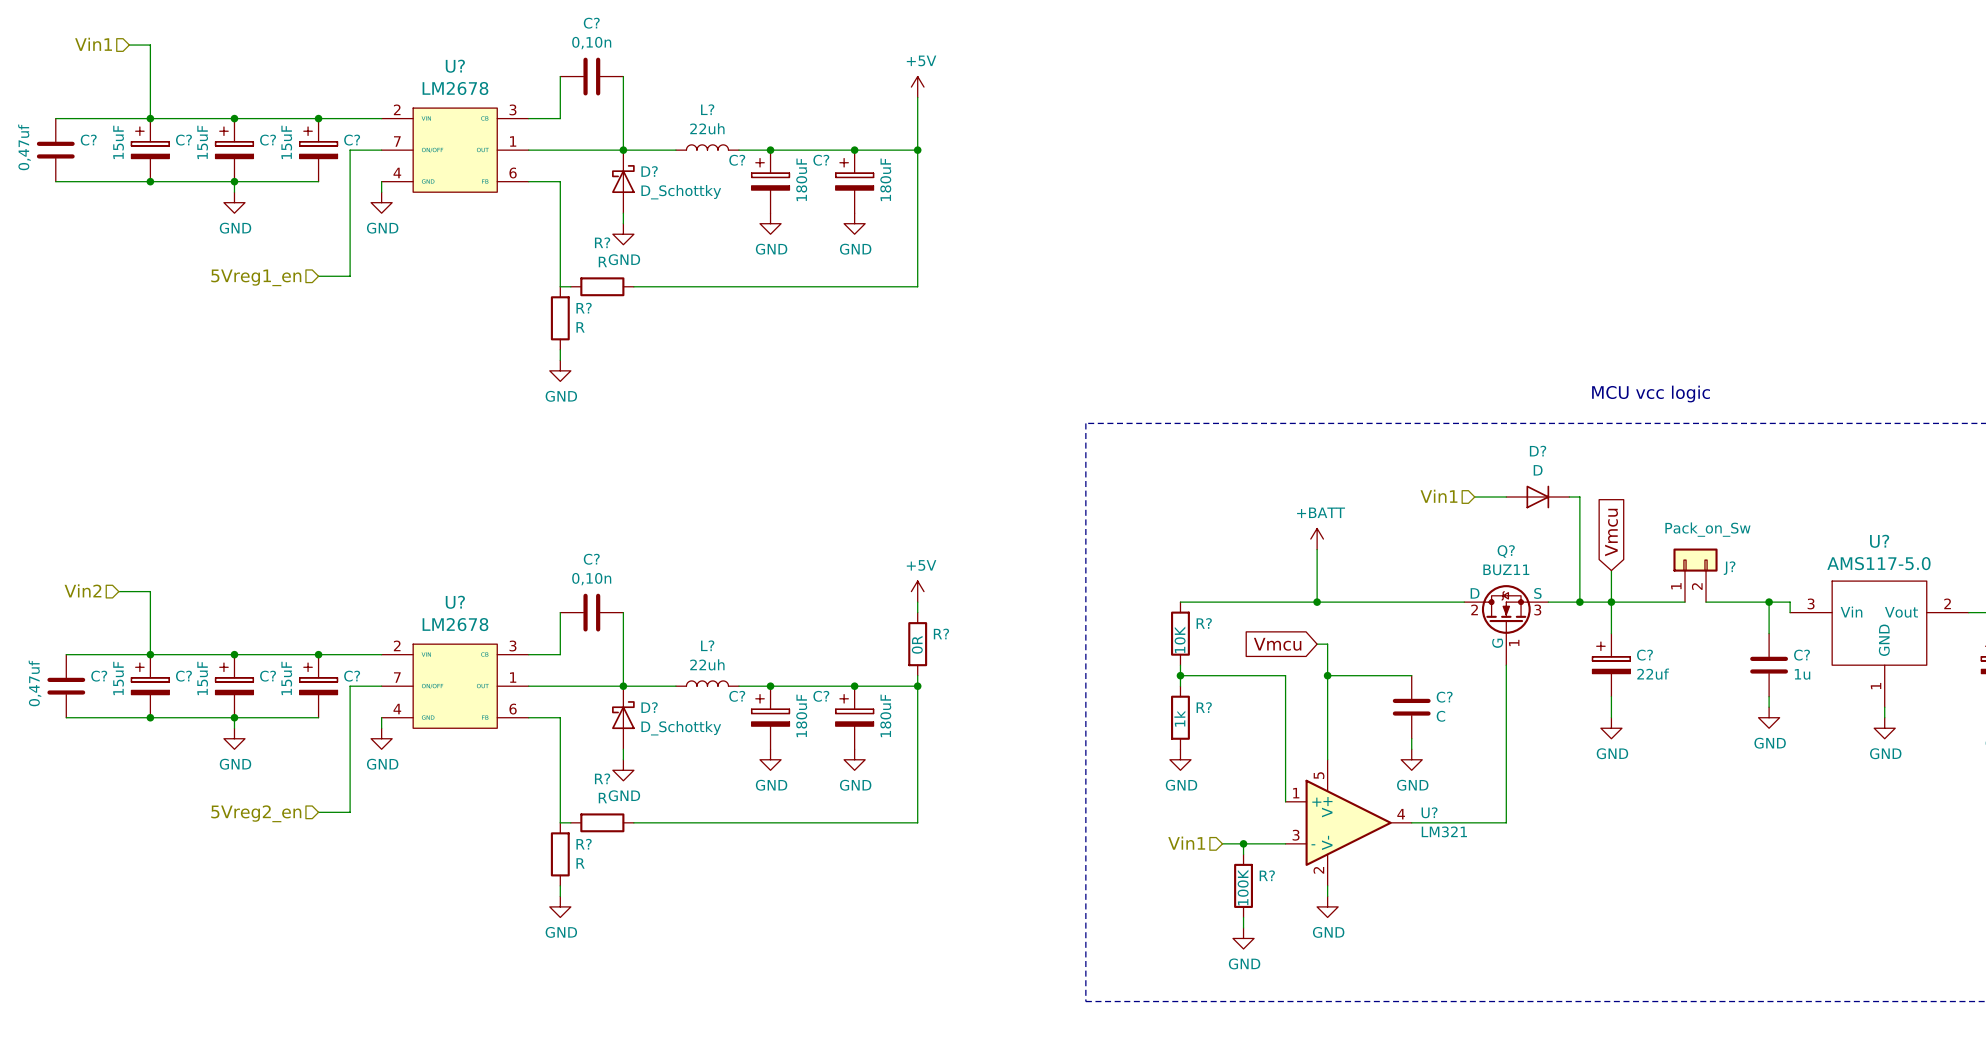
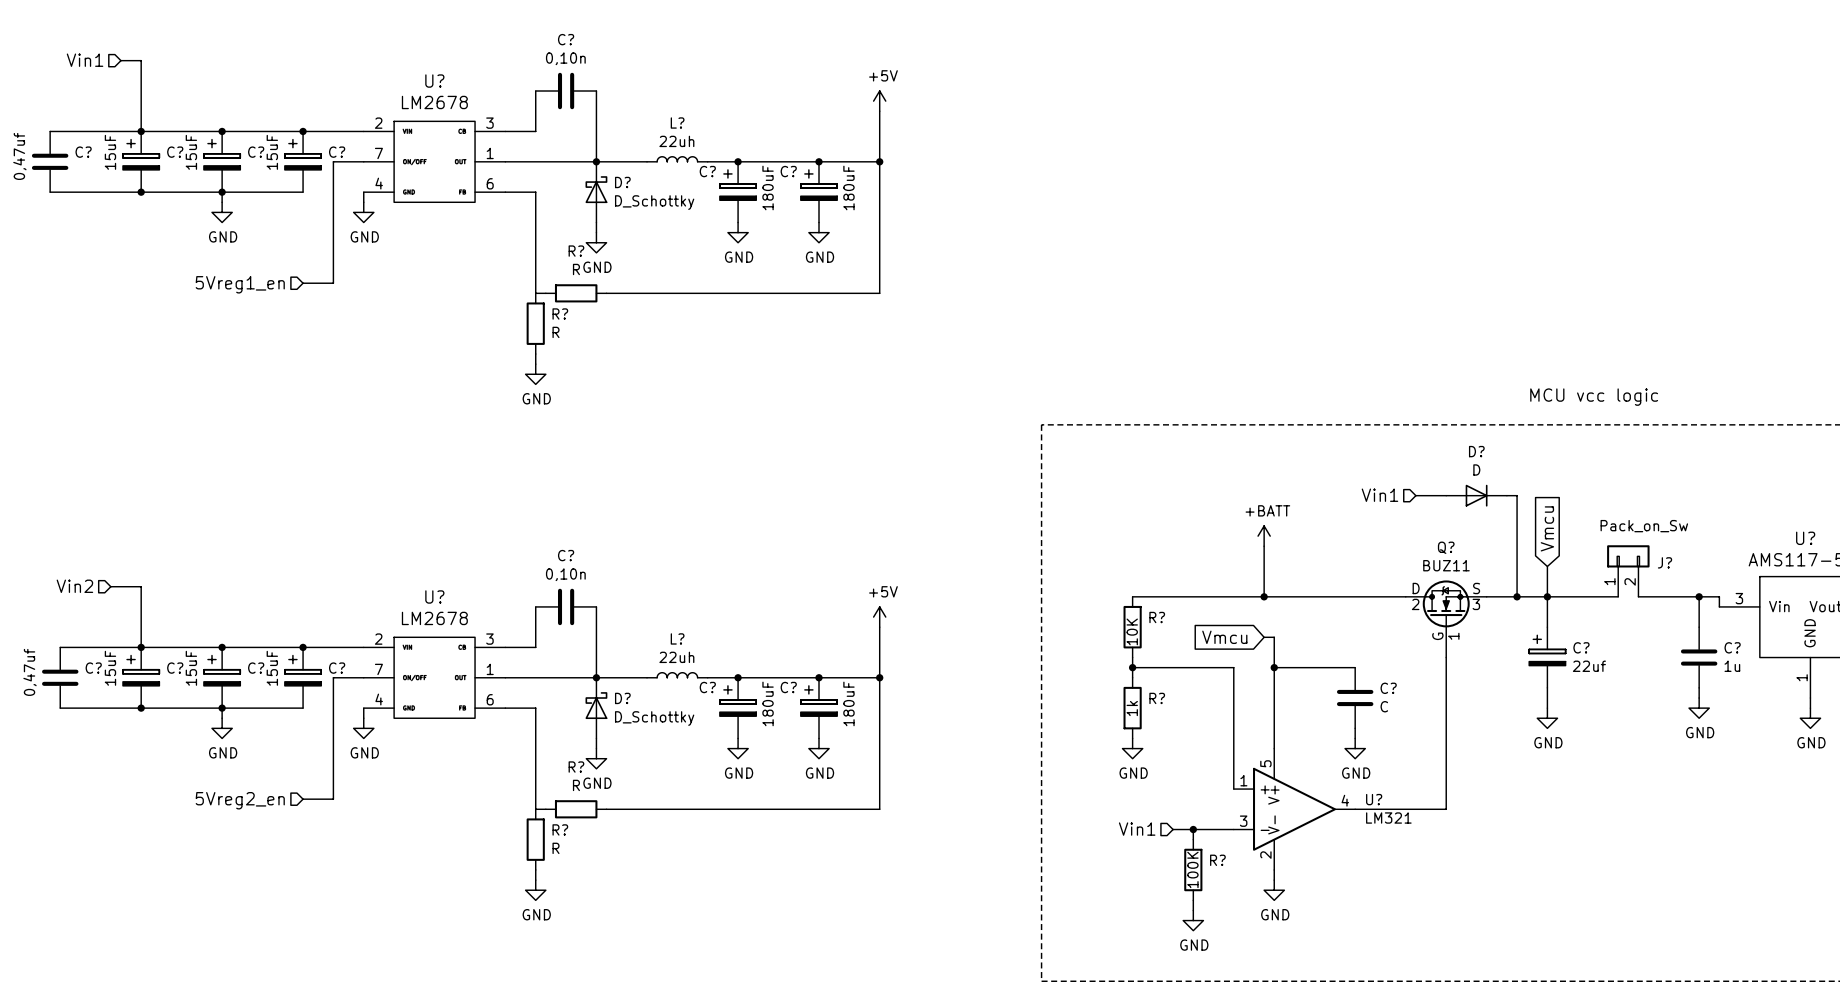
power symbol position: +5V (917, 591) -> +5V (879, 617)
wire: (917, 602) (917, 612) -> none
wire: none -> (879, 627) (879, 667)
R?: 0R (917, 644) -> none

